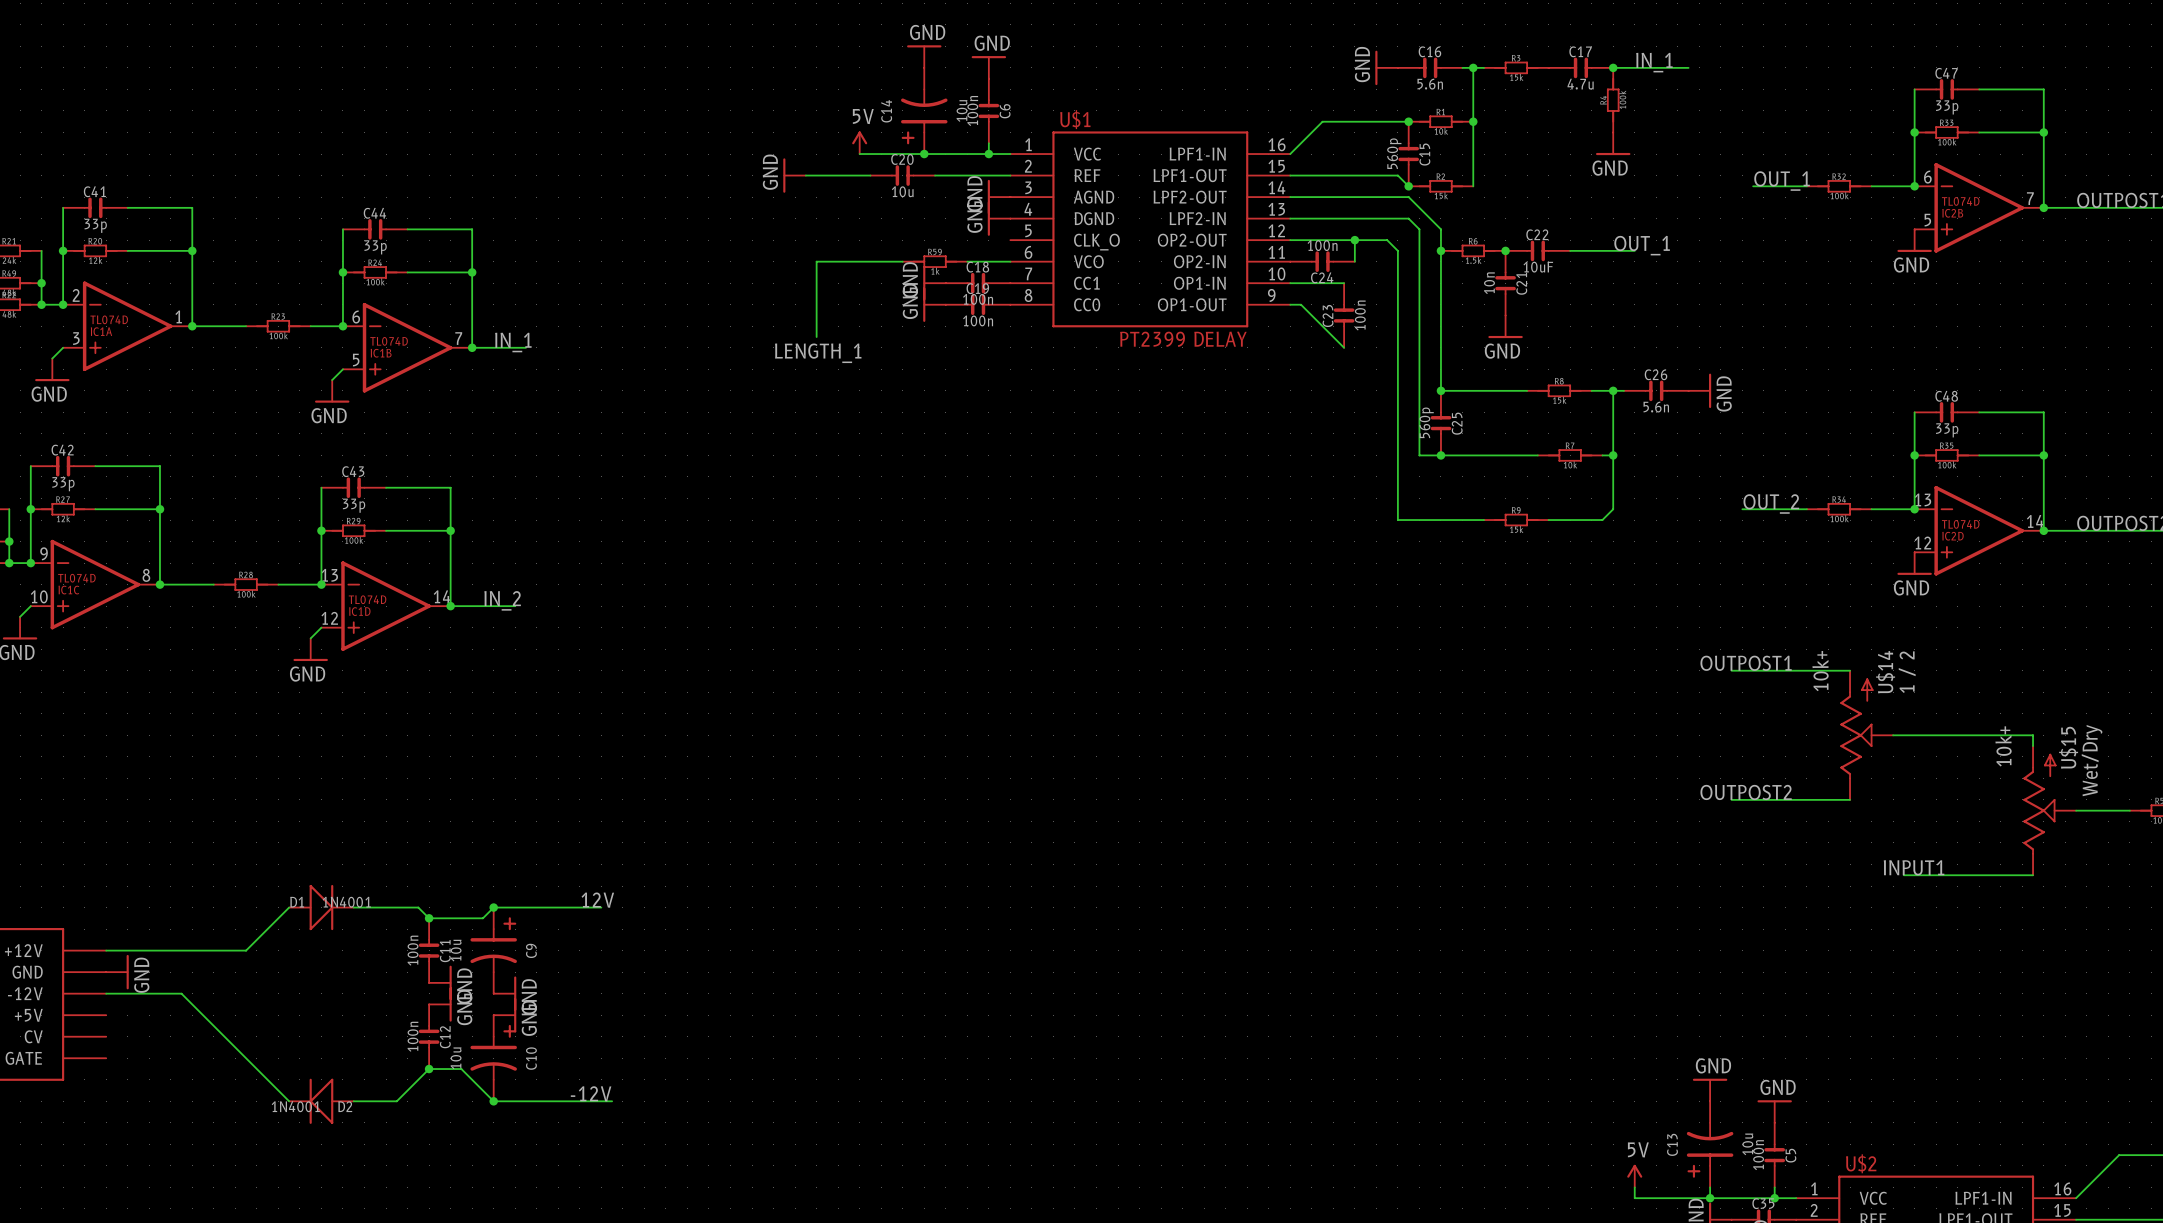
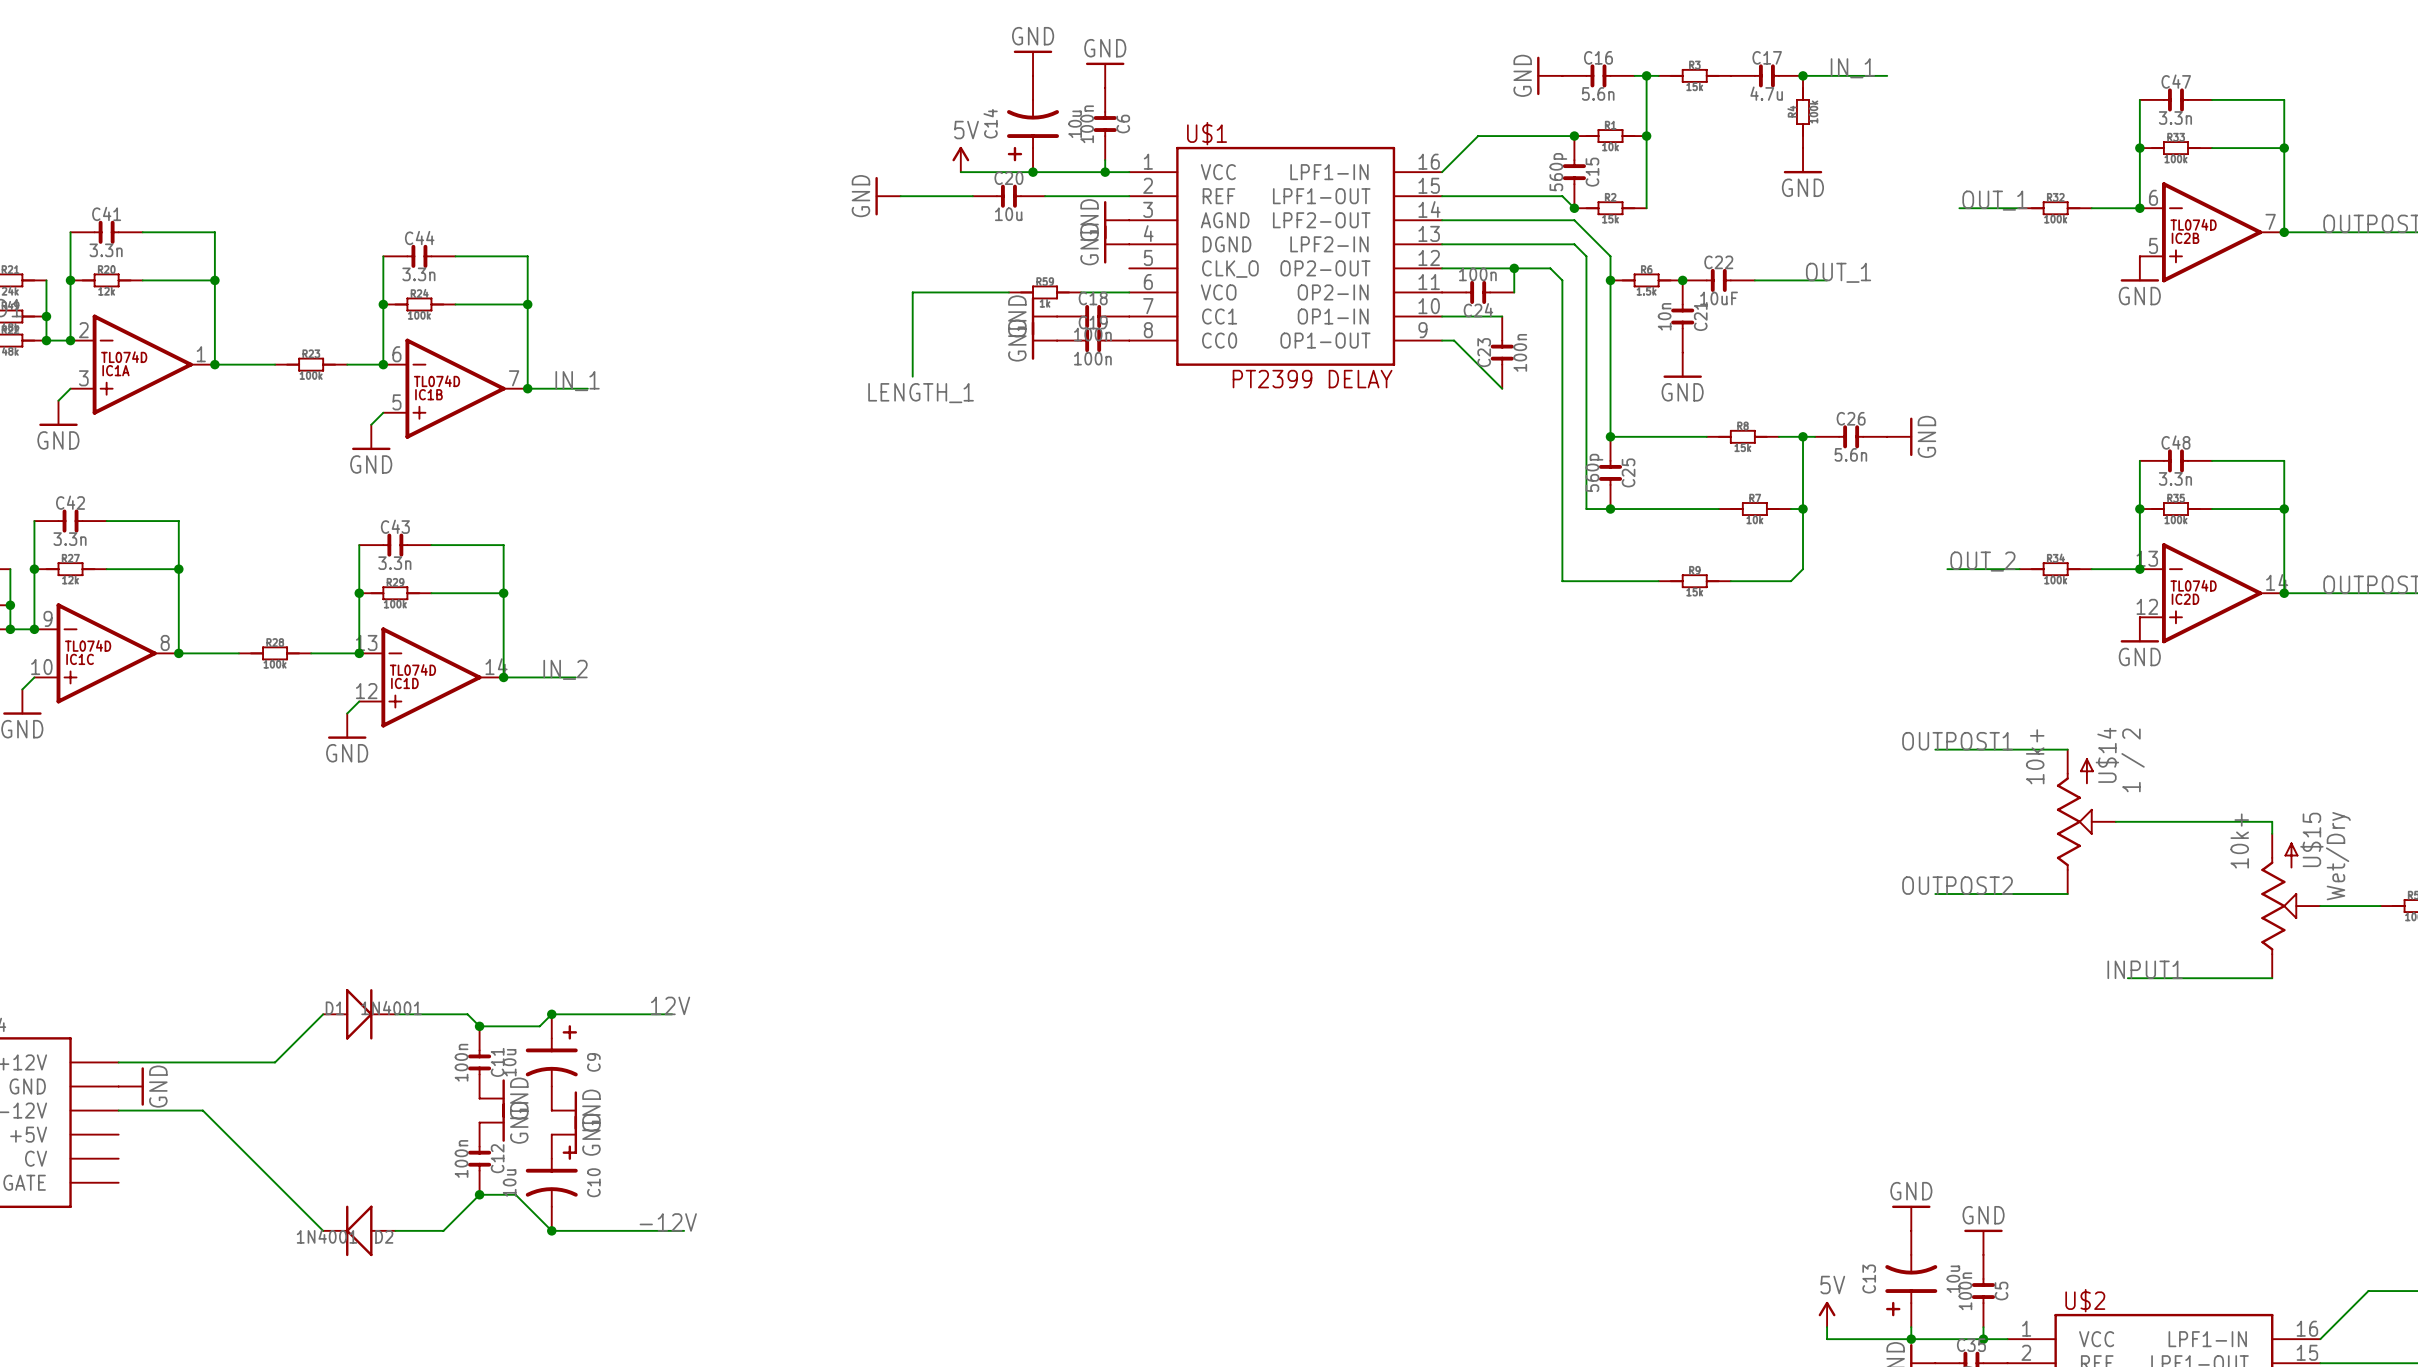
C47 value: 33p (1947, 107) -> 3.3n (2175, 118)
C41 value: 33p (95, 225) -> 3.3n (106, 250)
C44 value: 33p (375, 247) -> 3.3n (418, 274)
C48 value: 33p (1947, 430) -> 3.3n (2175, 478)
C42 value: 33p (63, 484) -> 3.3n (70, 539)
C43 value: 33p (354, 505) -> 3.3n (394, 563)

